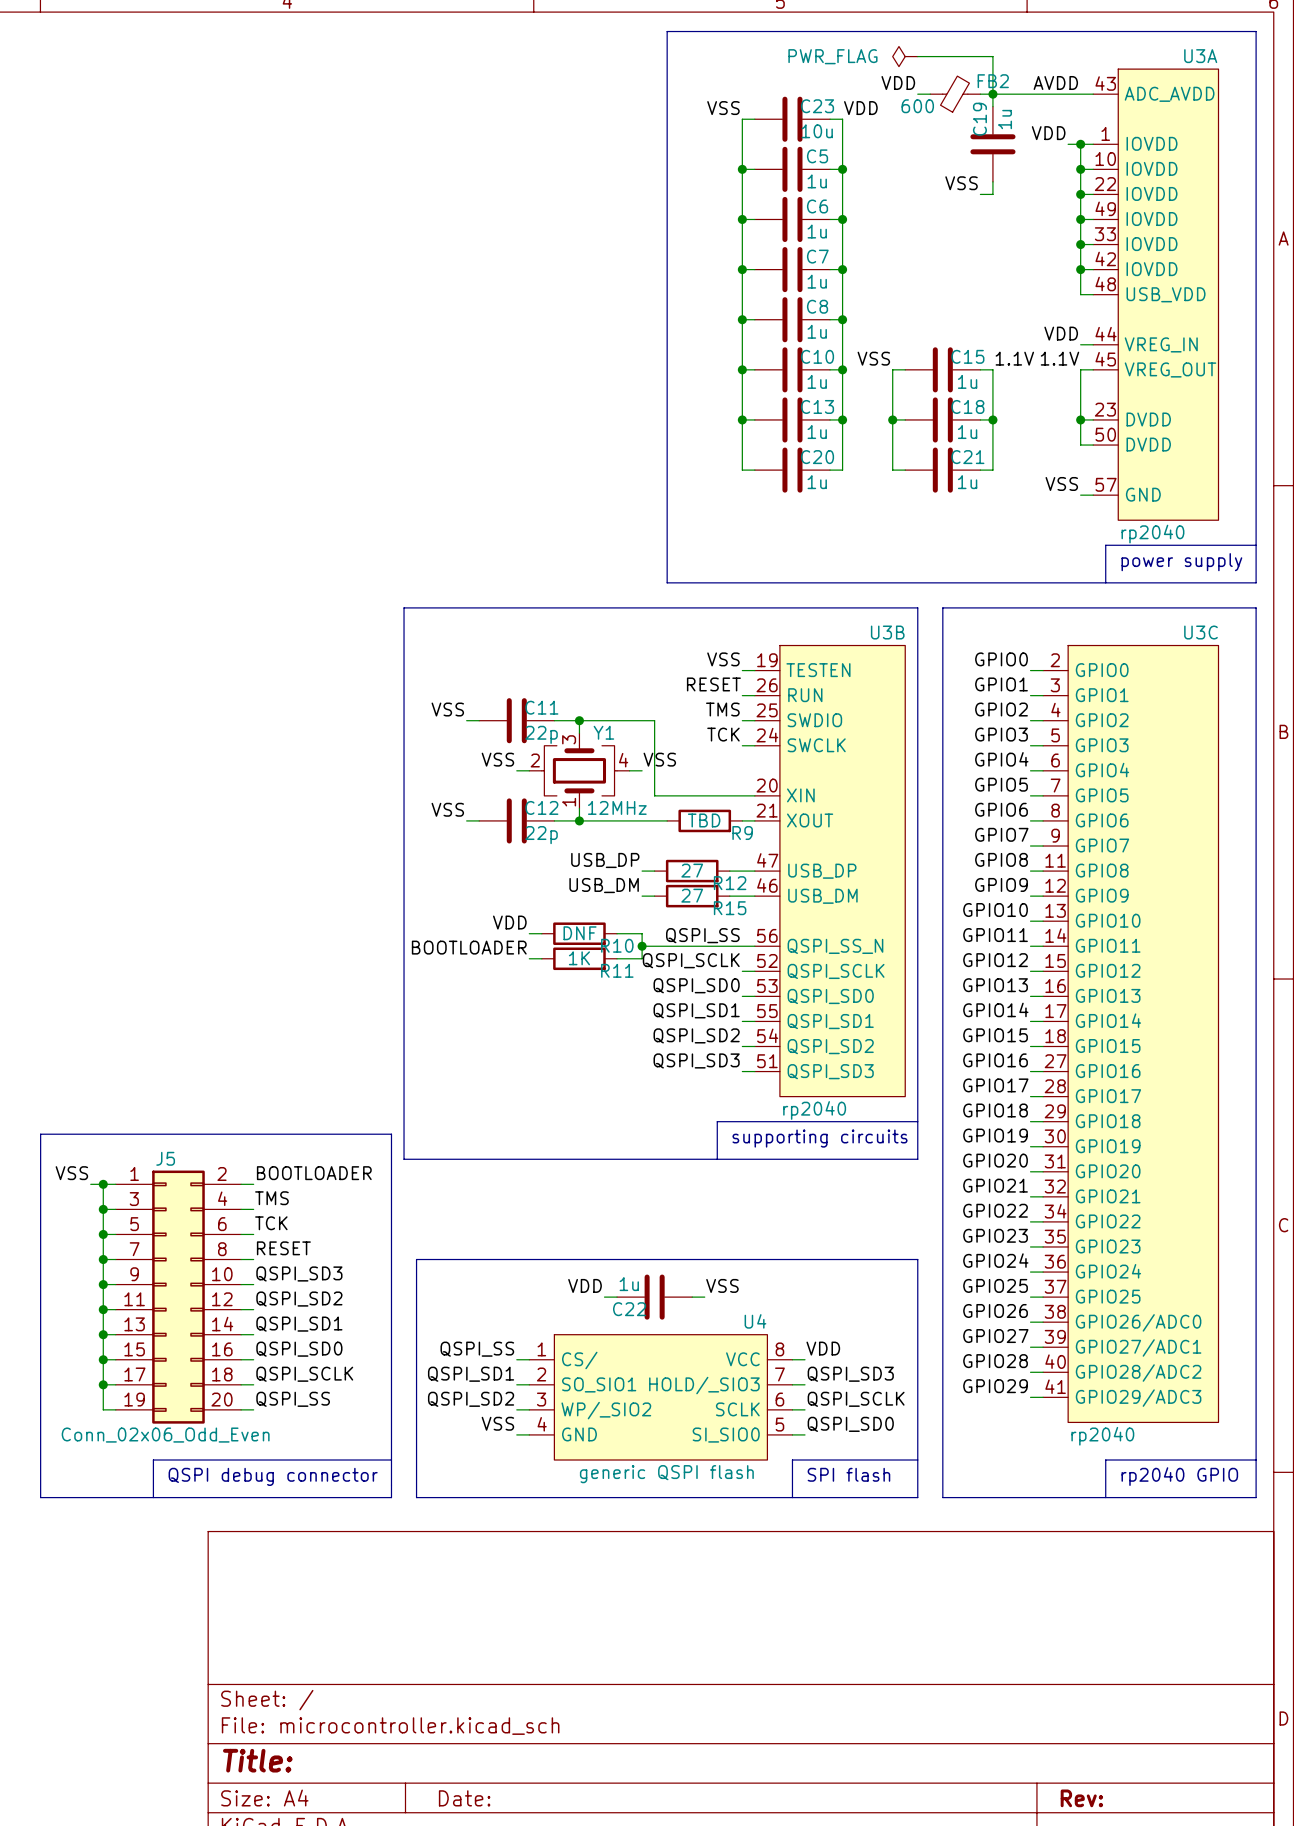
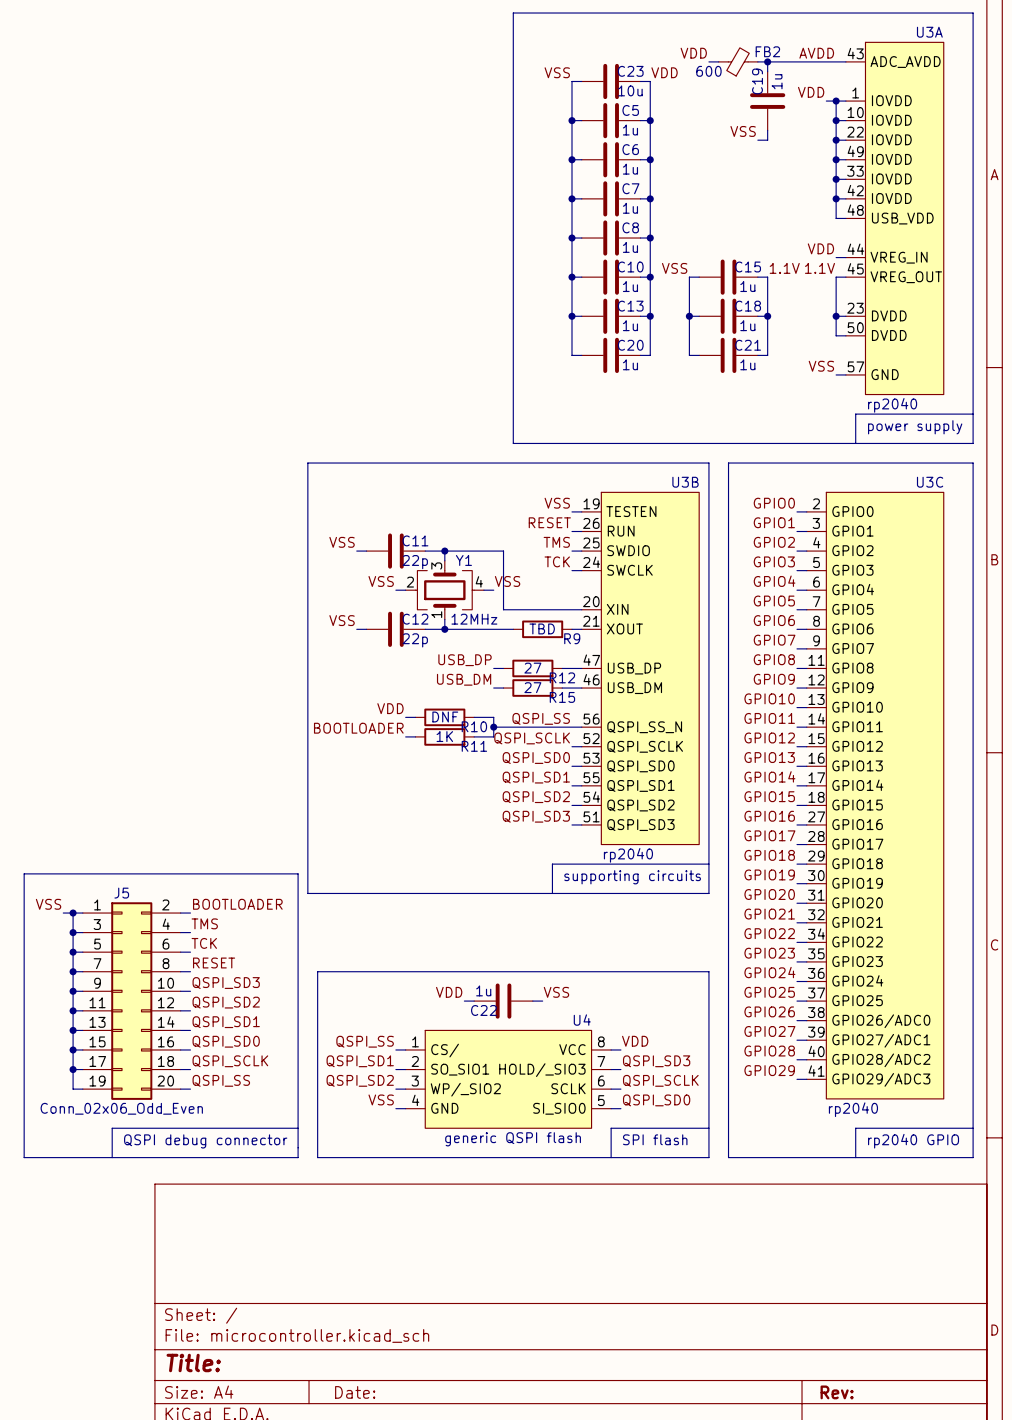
power symbol: PWR_FLAG (905, 56) -> none
wire: (917, 56) (992, 56) (992, 94) -> none

